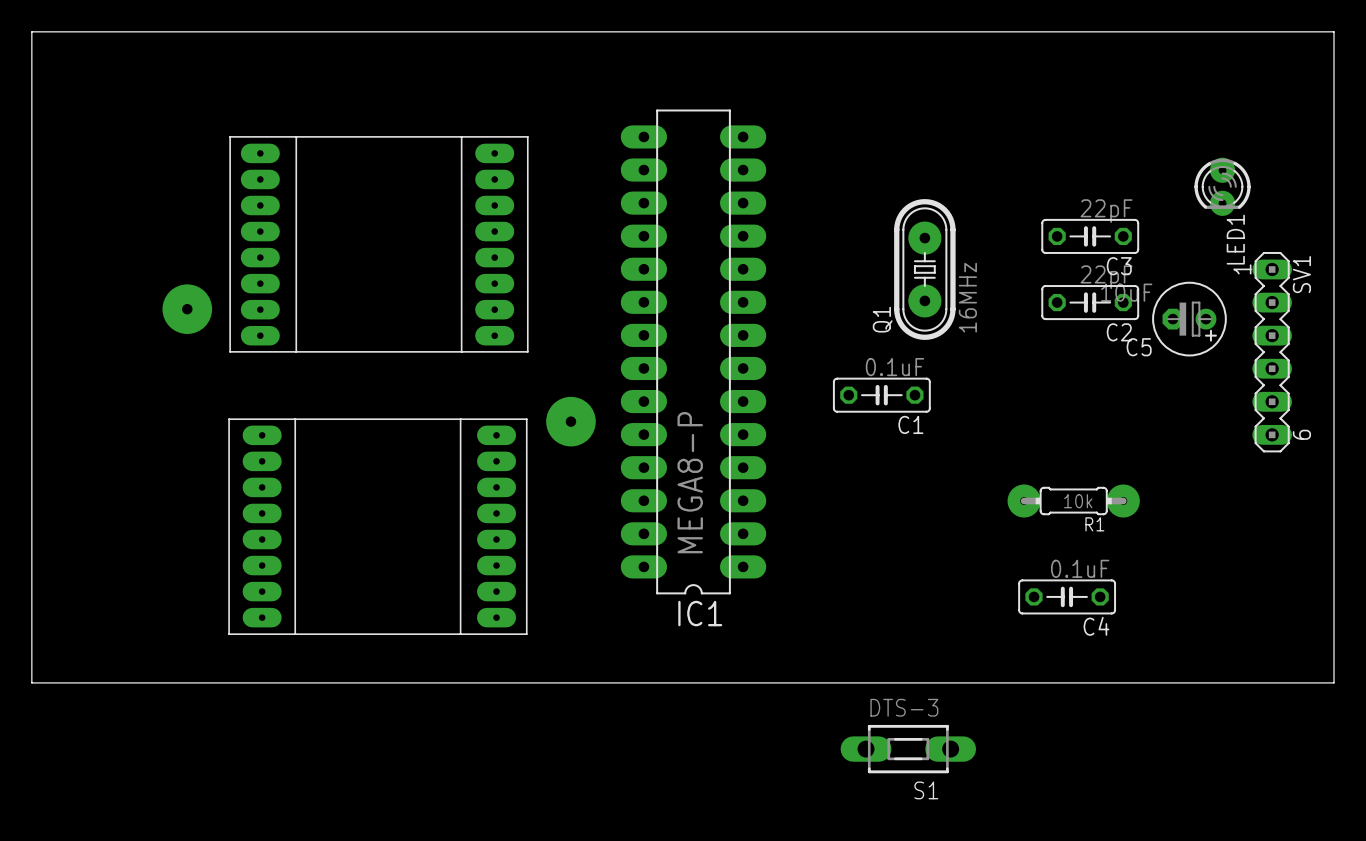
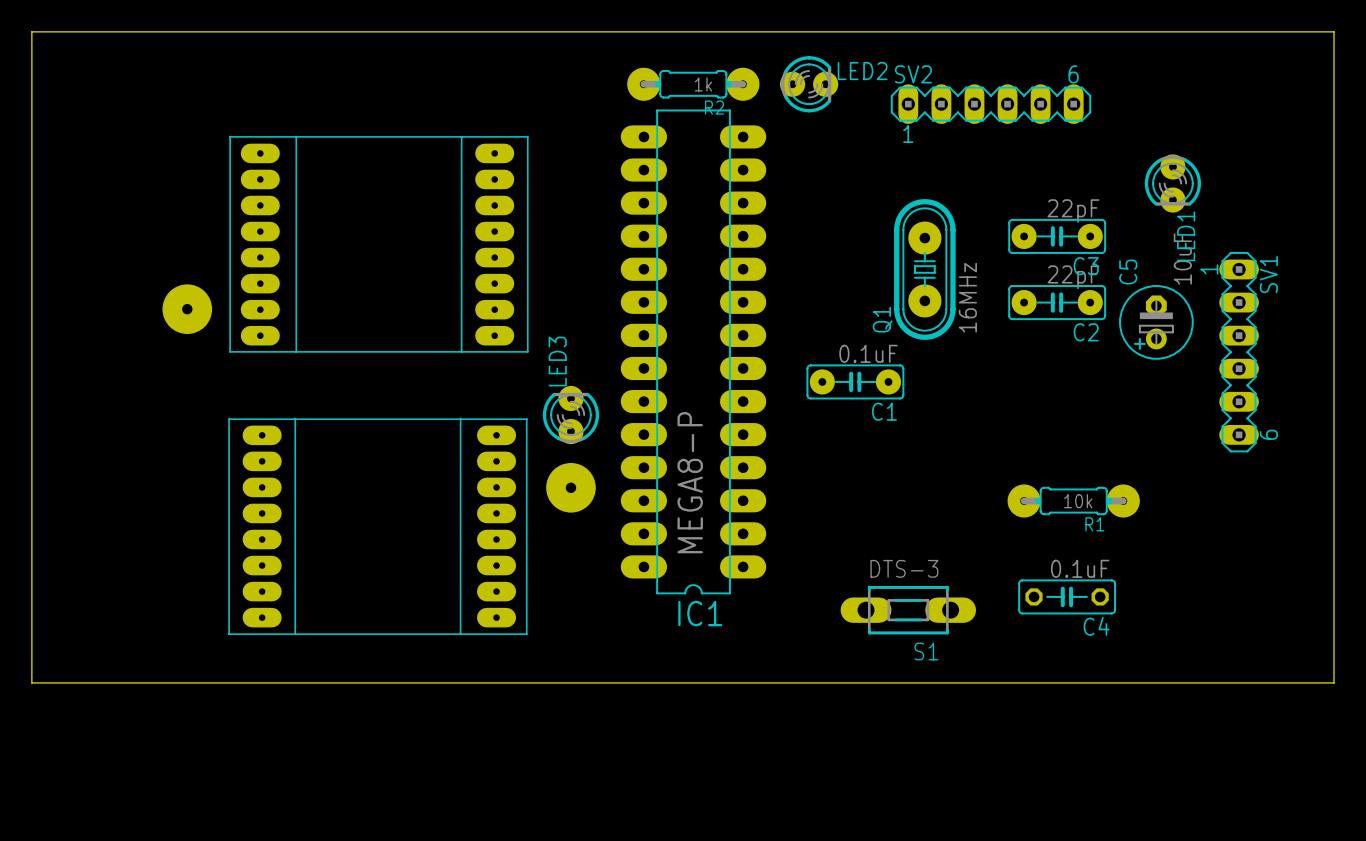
R2: none -> 1k (693, 84)
LED2: none -> (809, 84)
SV2: none -> (991, 104)
LED1 position: (1222, 186) -> (1172, 183)
C3 footprint: [1041, 218, 1140, 254] -> [1008, 218, 1107, 254]
C2 footprint: [1041, 285, 1140, 321] -> [1008, 285, 1107, 321]
C5 rotation: 0° (1189, 319) -> 90° clockwise (1156, 322)
SV1 position: (1272, 352) -> (1239, 352)
C1 footprint: [832, 377, 931, 413] -> [806, 364, 905, 400]
LED3: none -> (570, 415)
part position: (570, 421) -> (570, 487)
S1 position: (908, 749) -> (908, 610)

